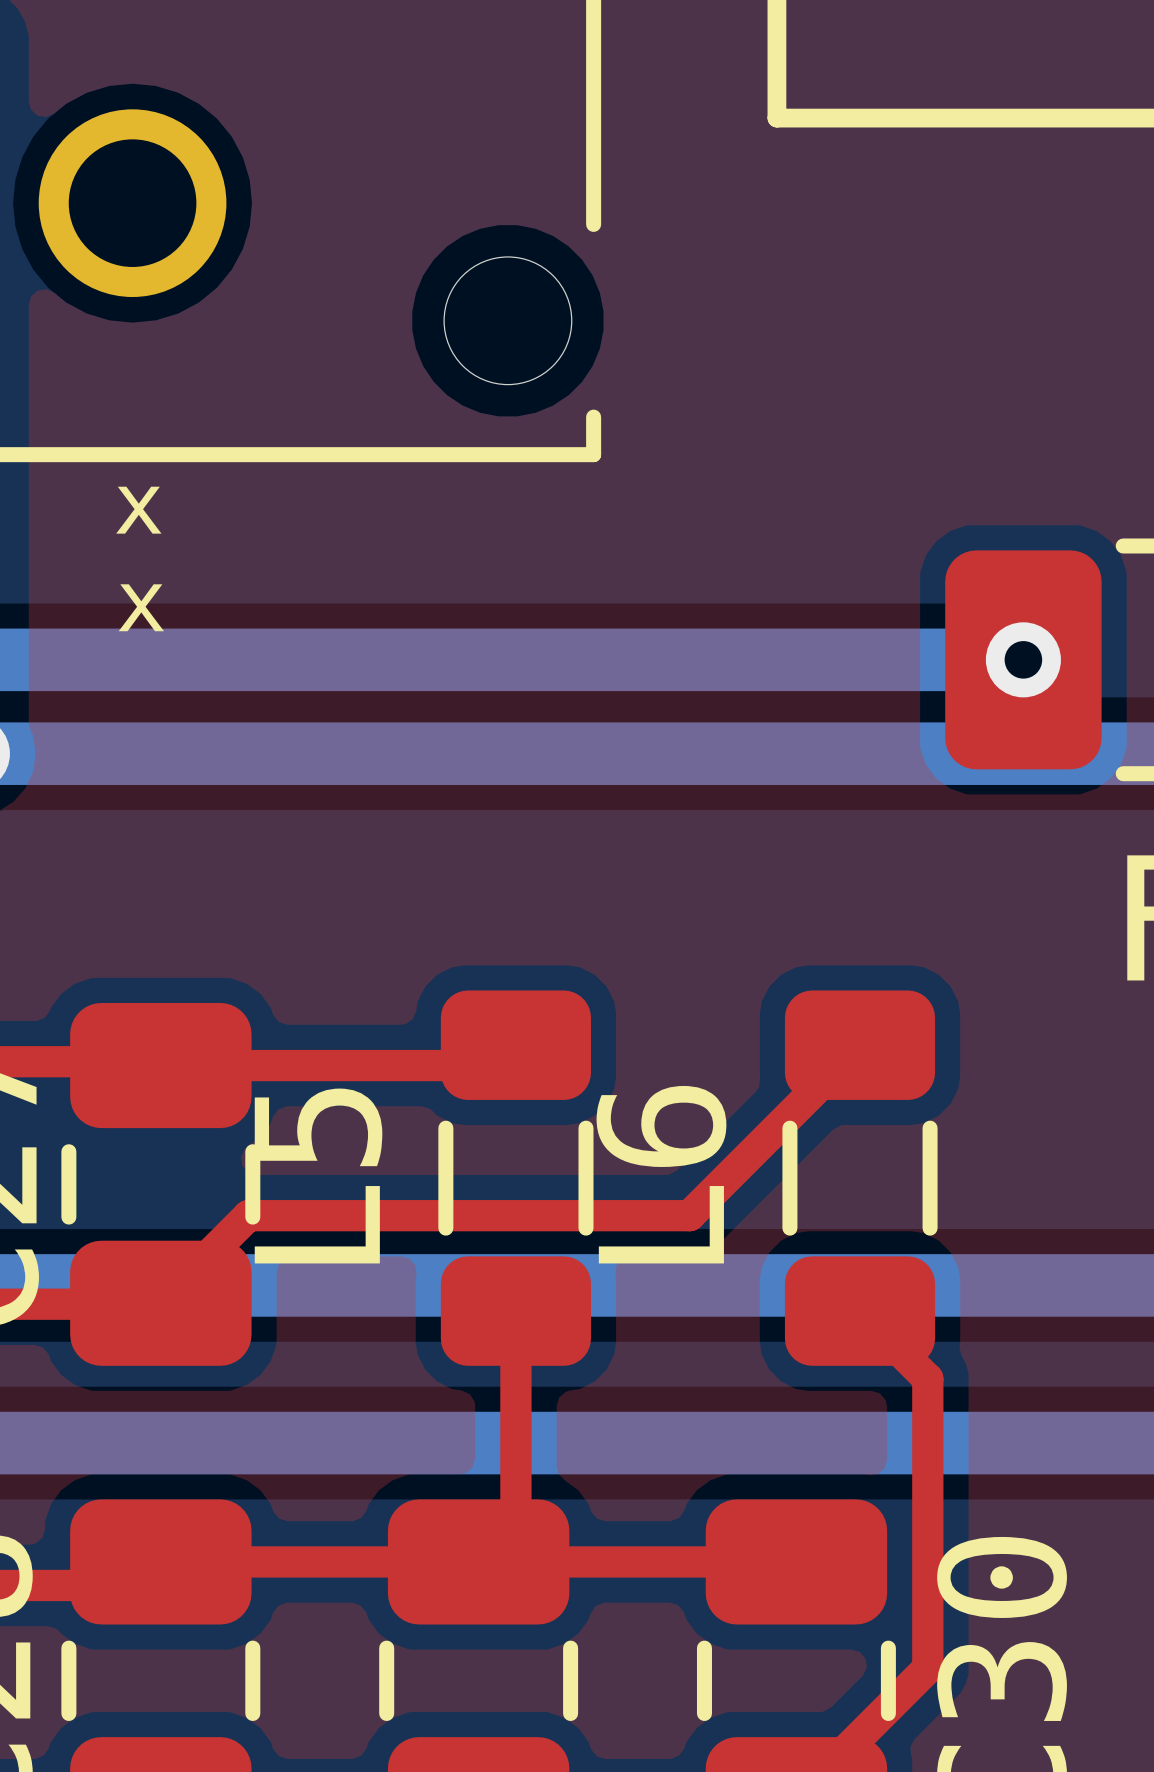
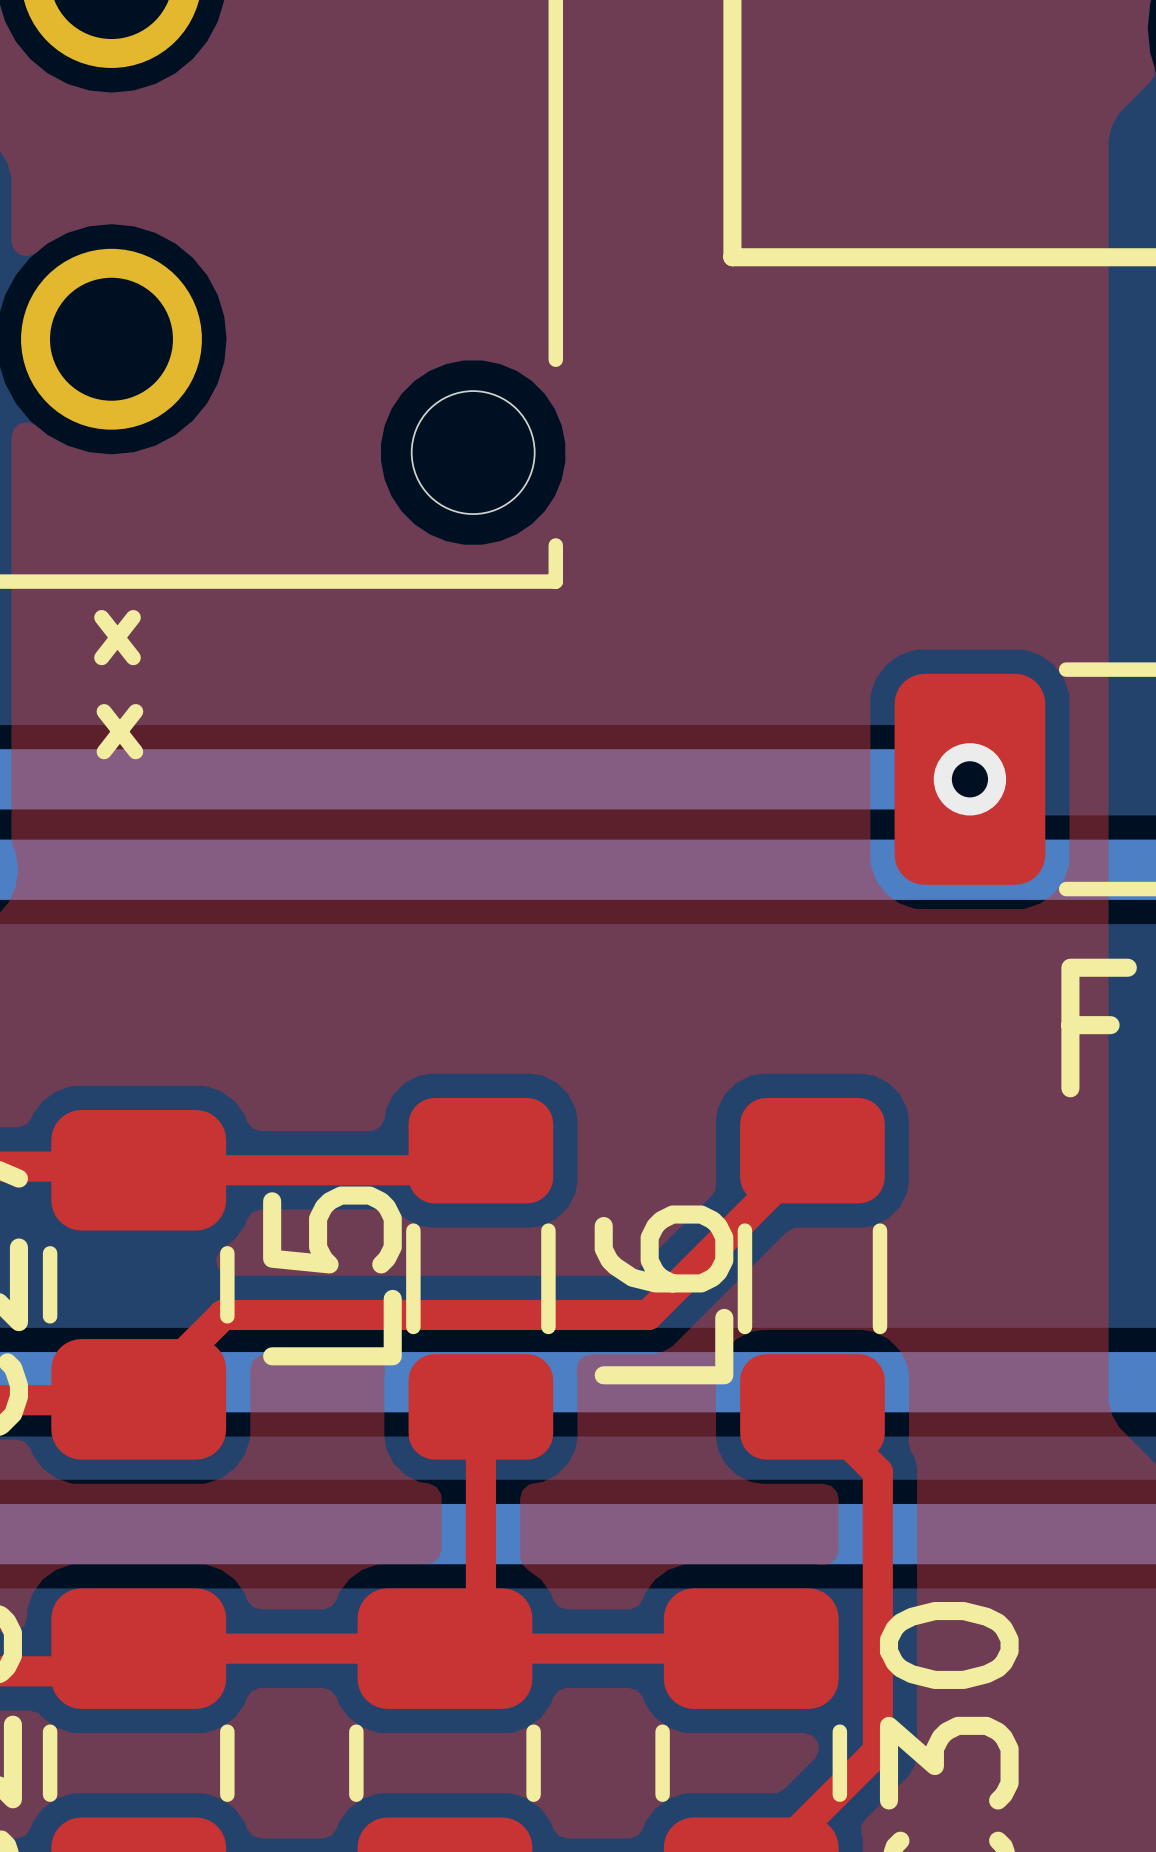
L6 name position: L6 (661, 1174) -> L6 (664, 1294)
L5 name position: L5 (318, 1176) -> L5 (332, 1275)

